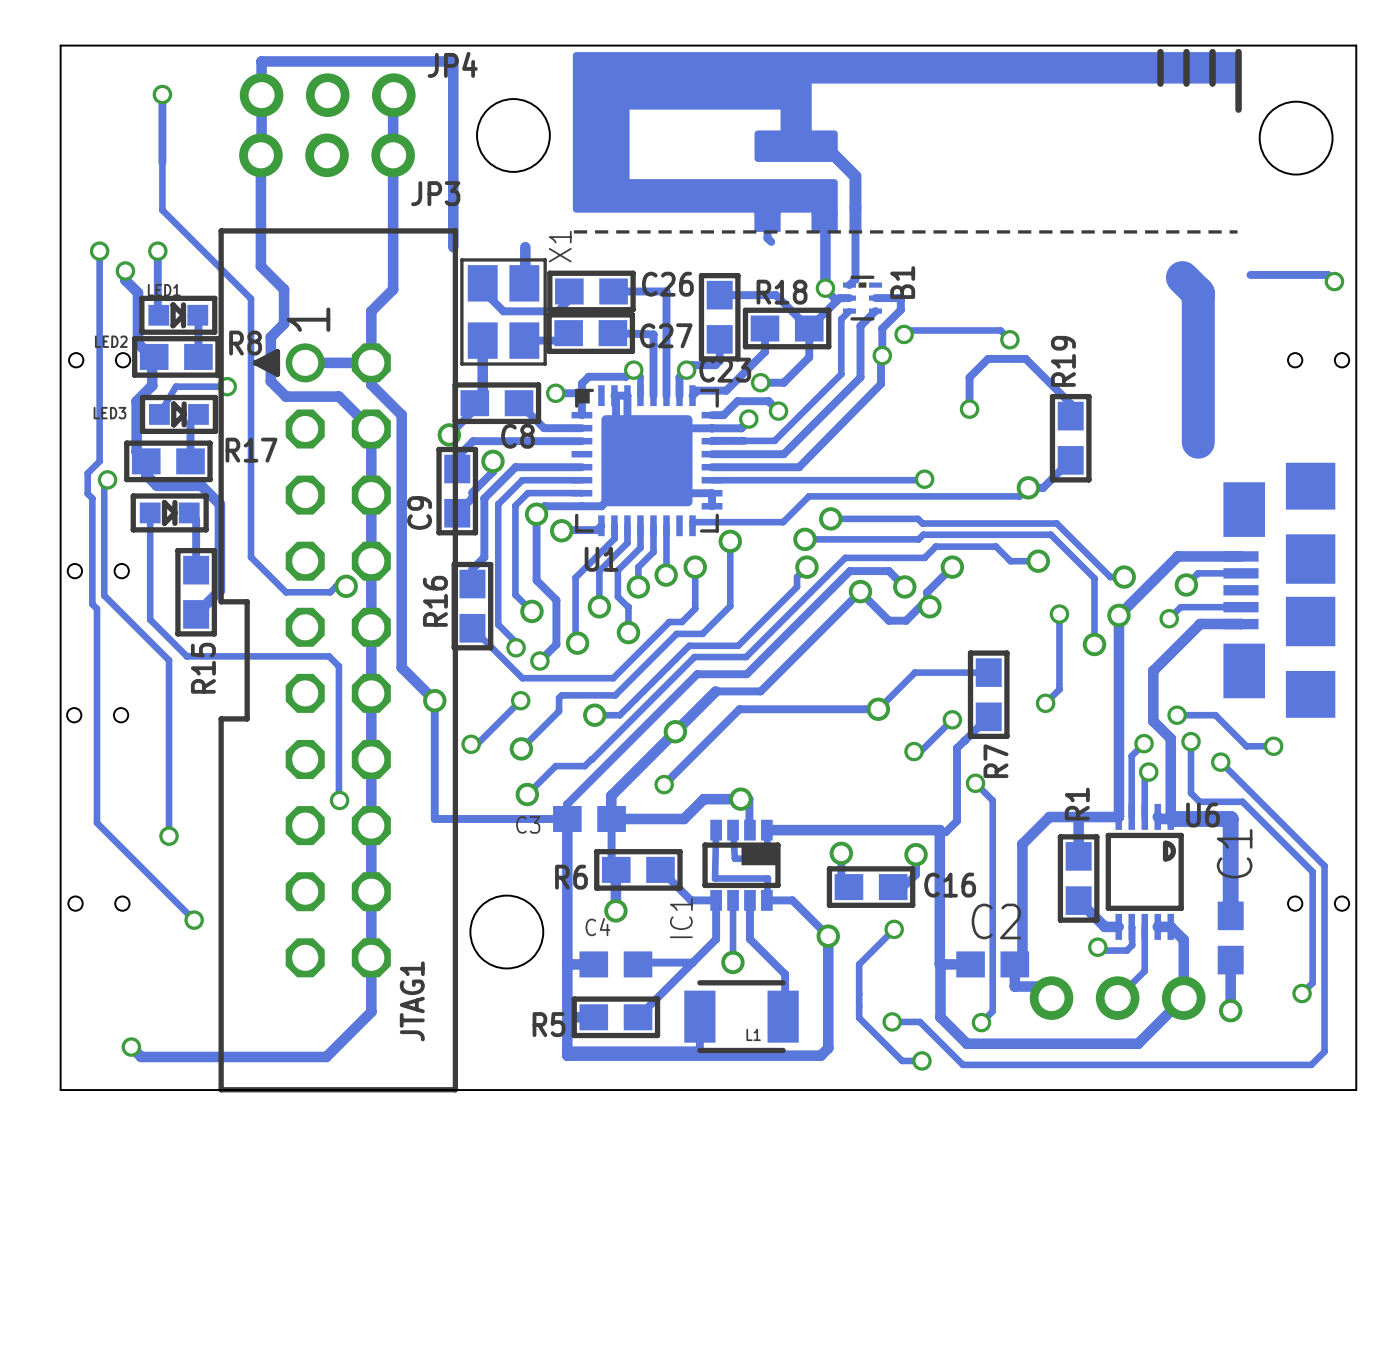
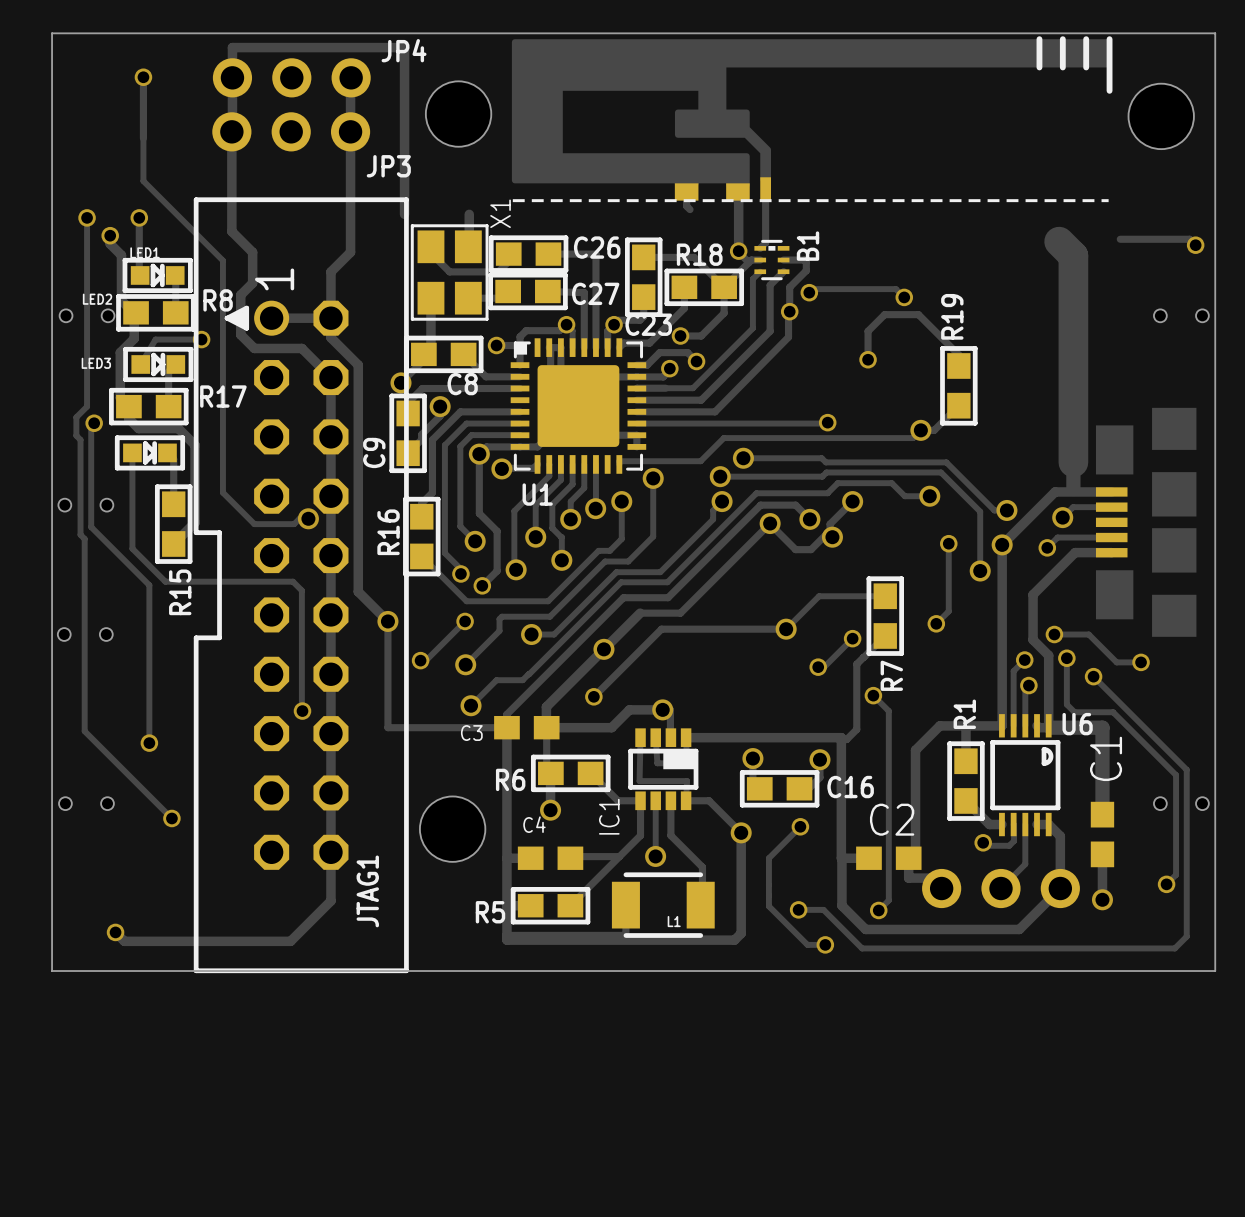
track: none -> (1073, 389) (1073, 489)

